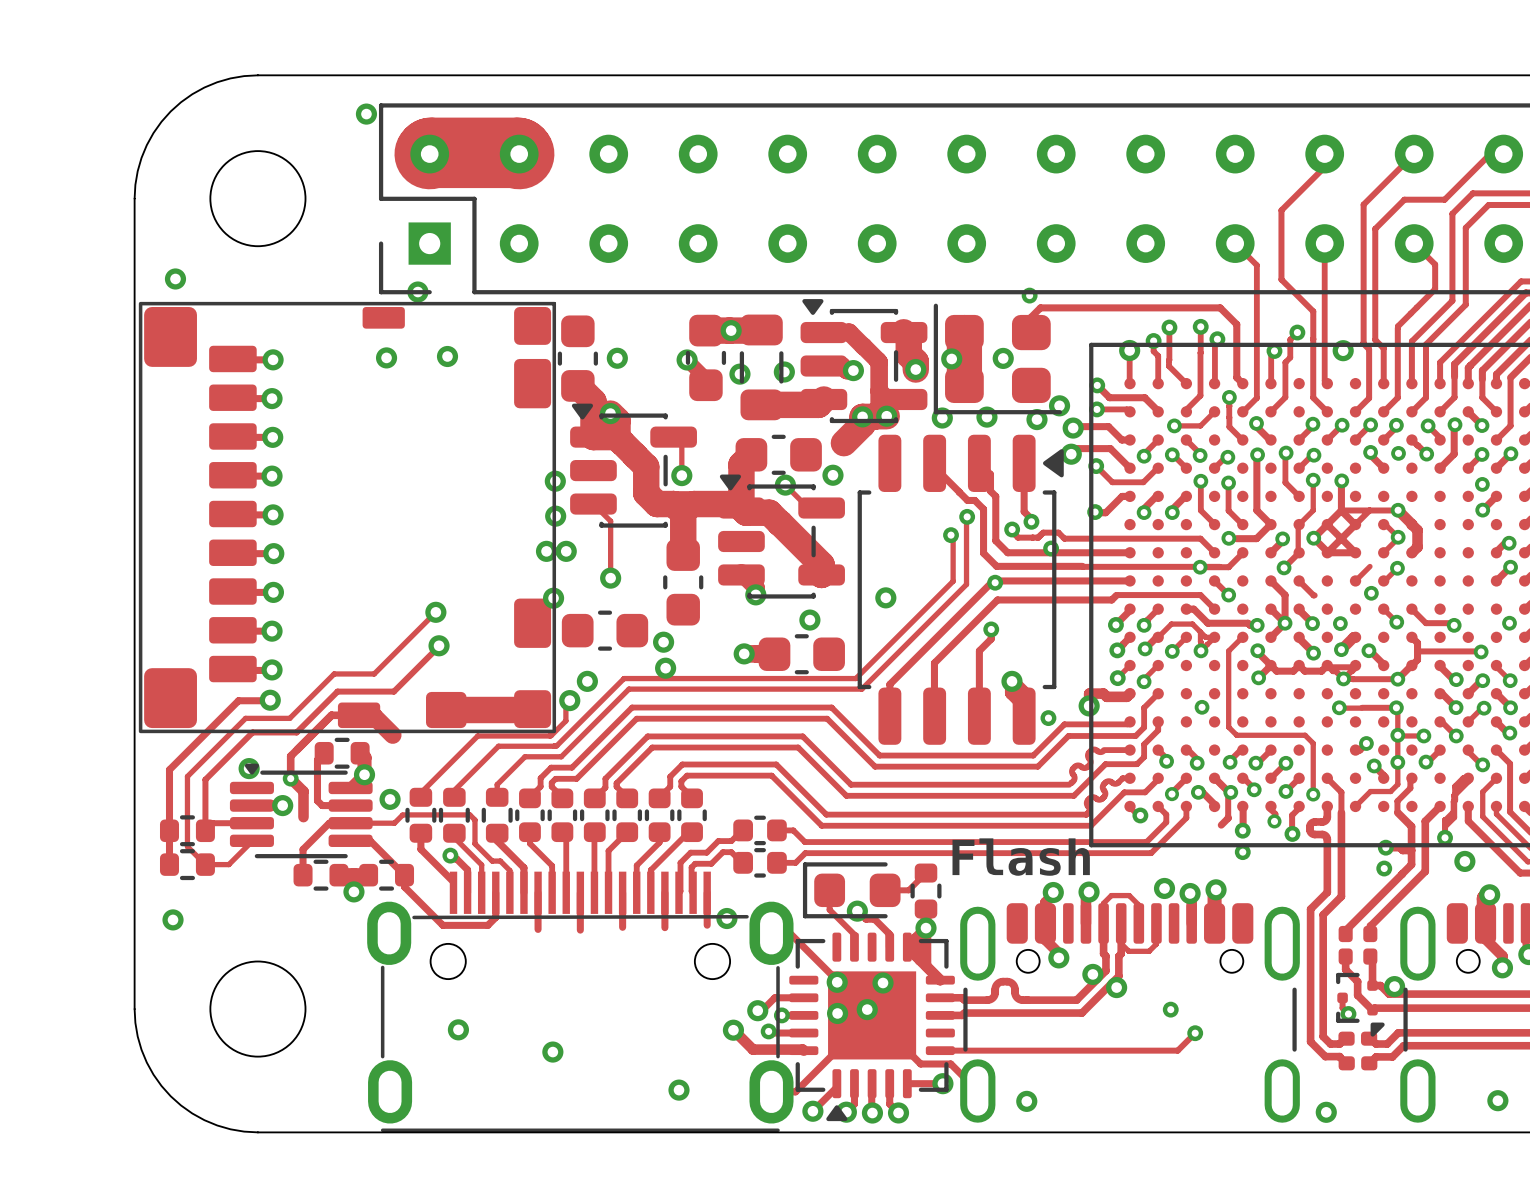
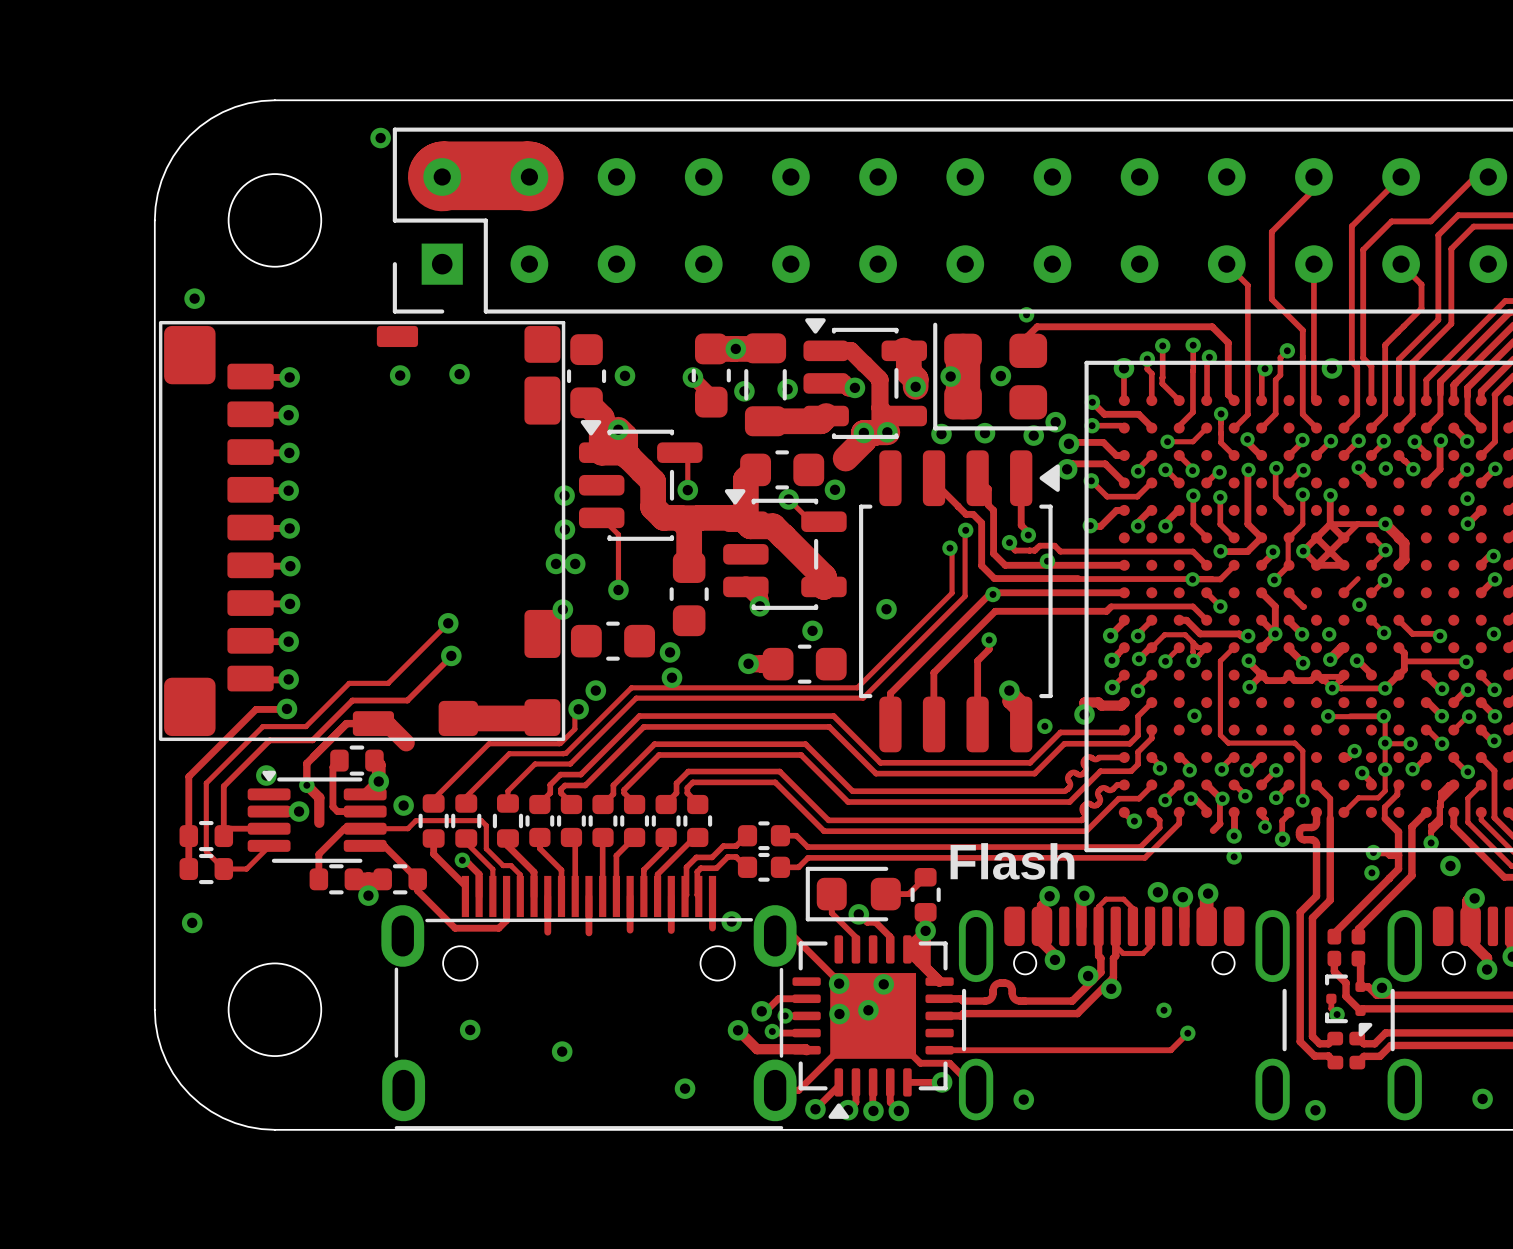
via: (417, 292) -> none

